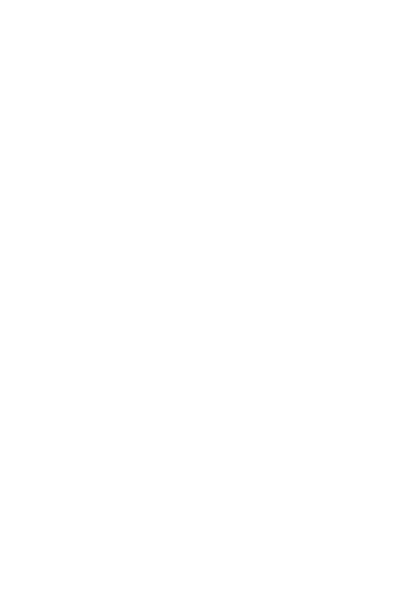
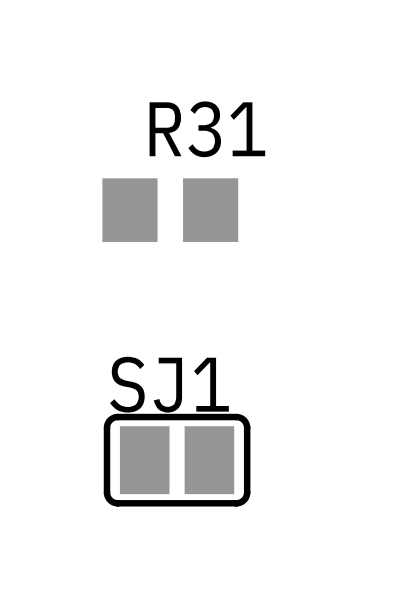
R31: none -> (170, 210)
SJ1: none -> (177, 460)

